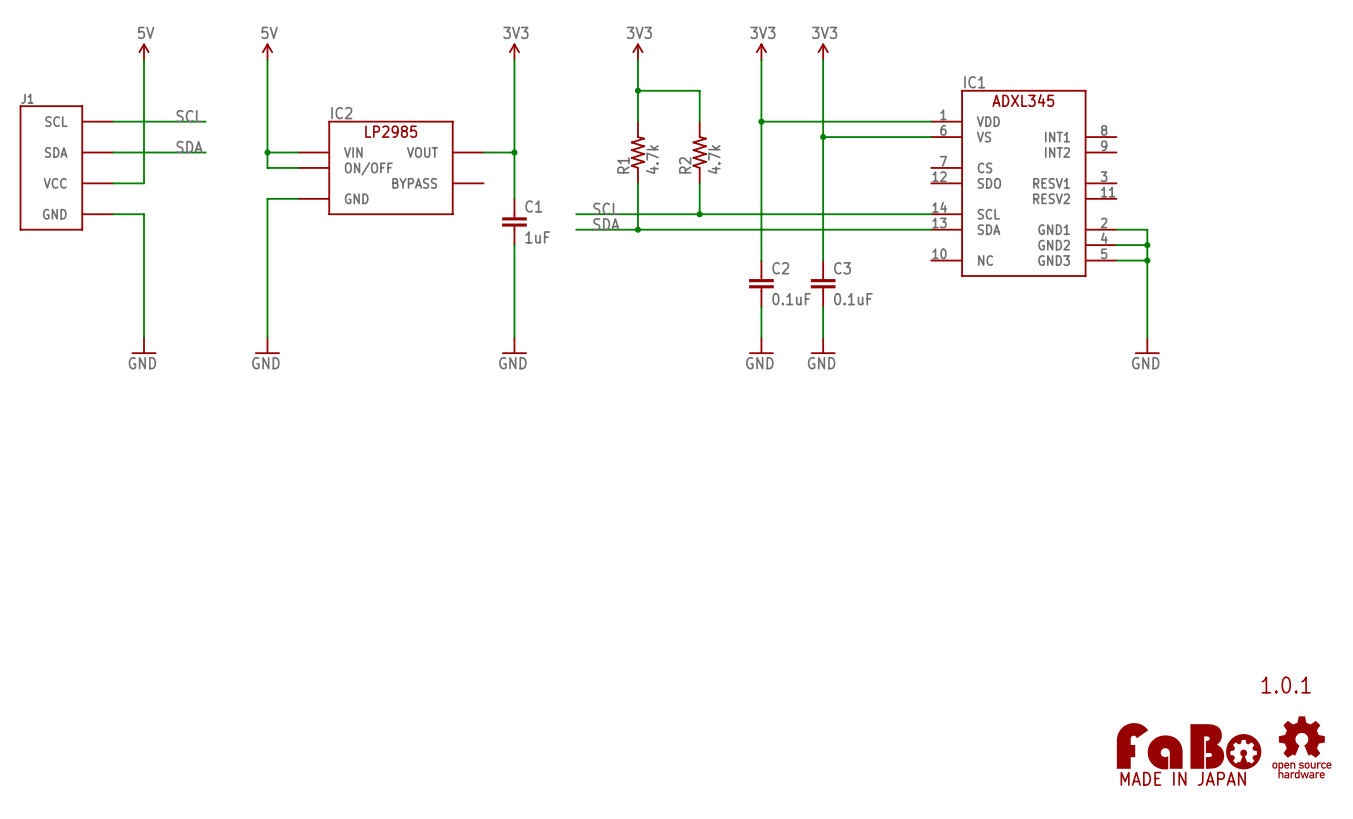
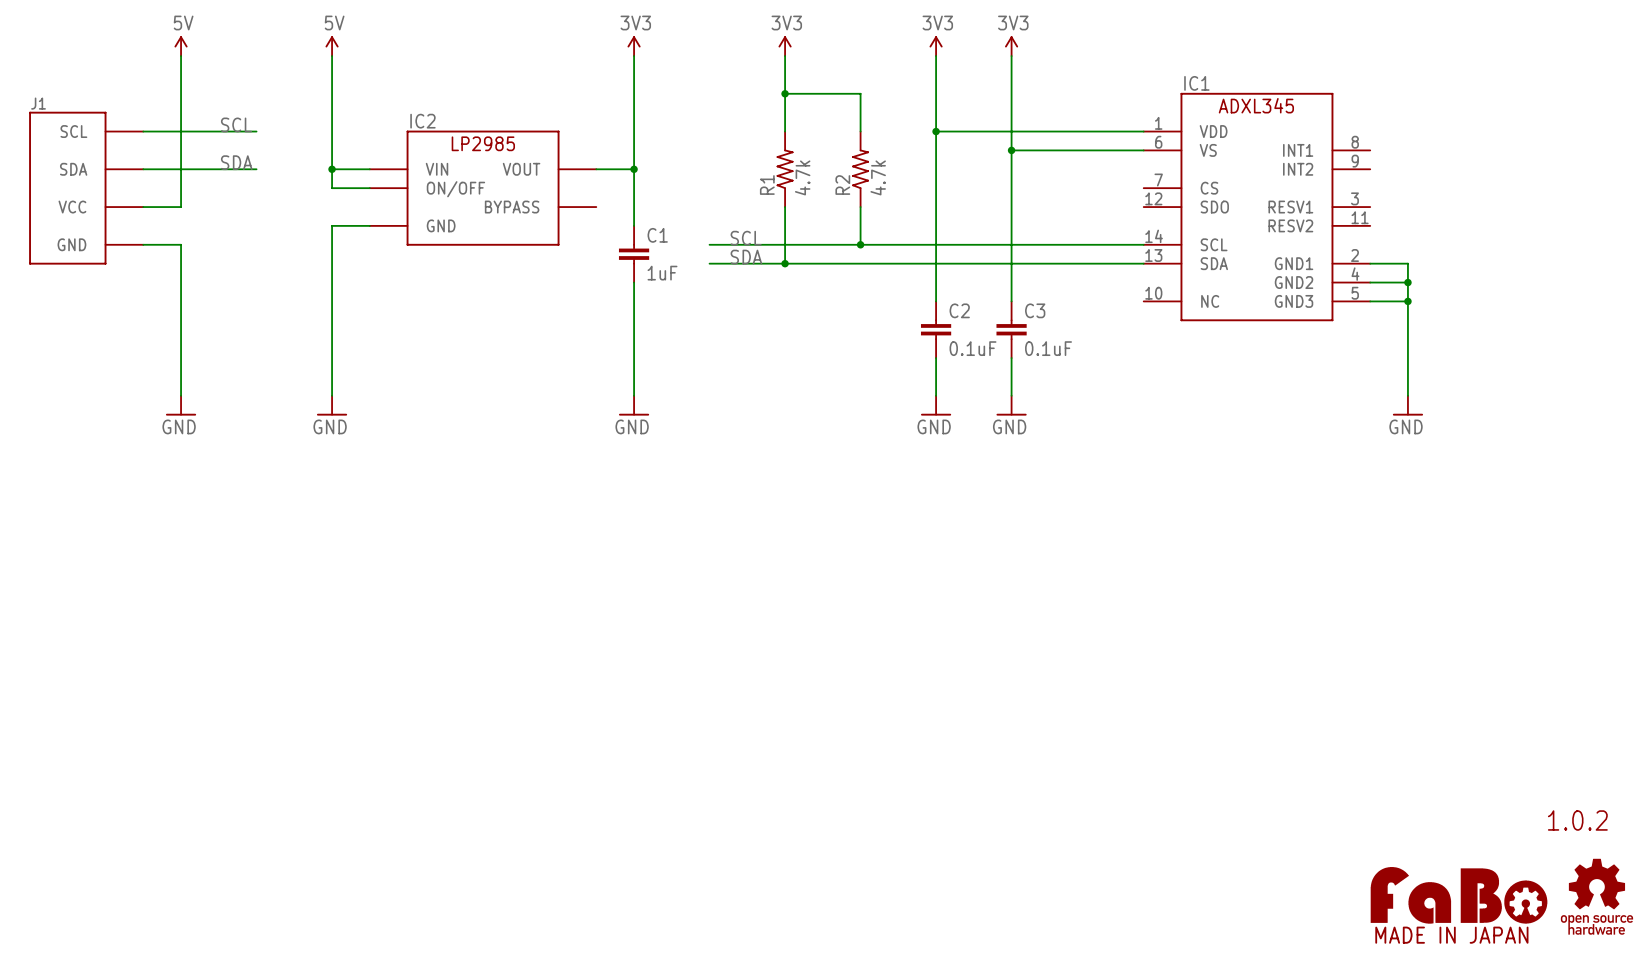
text: 1.0.1 (1286, 685) -> 1.0.2 (1577, 820)

